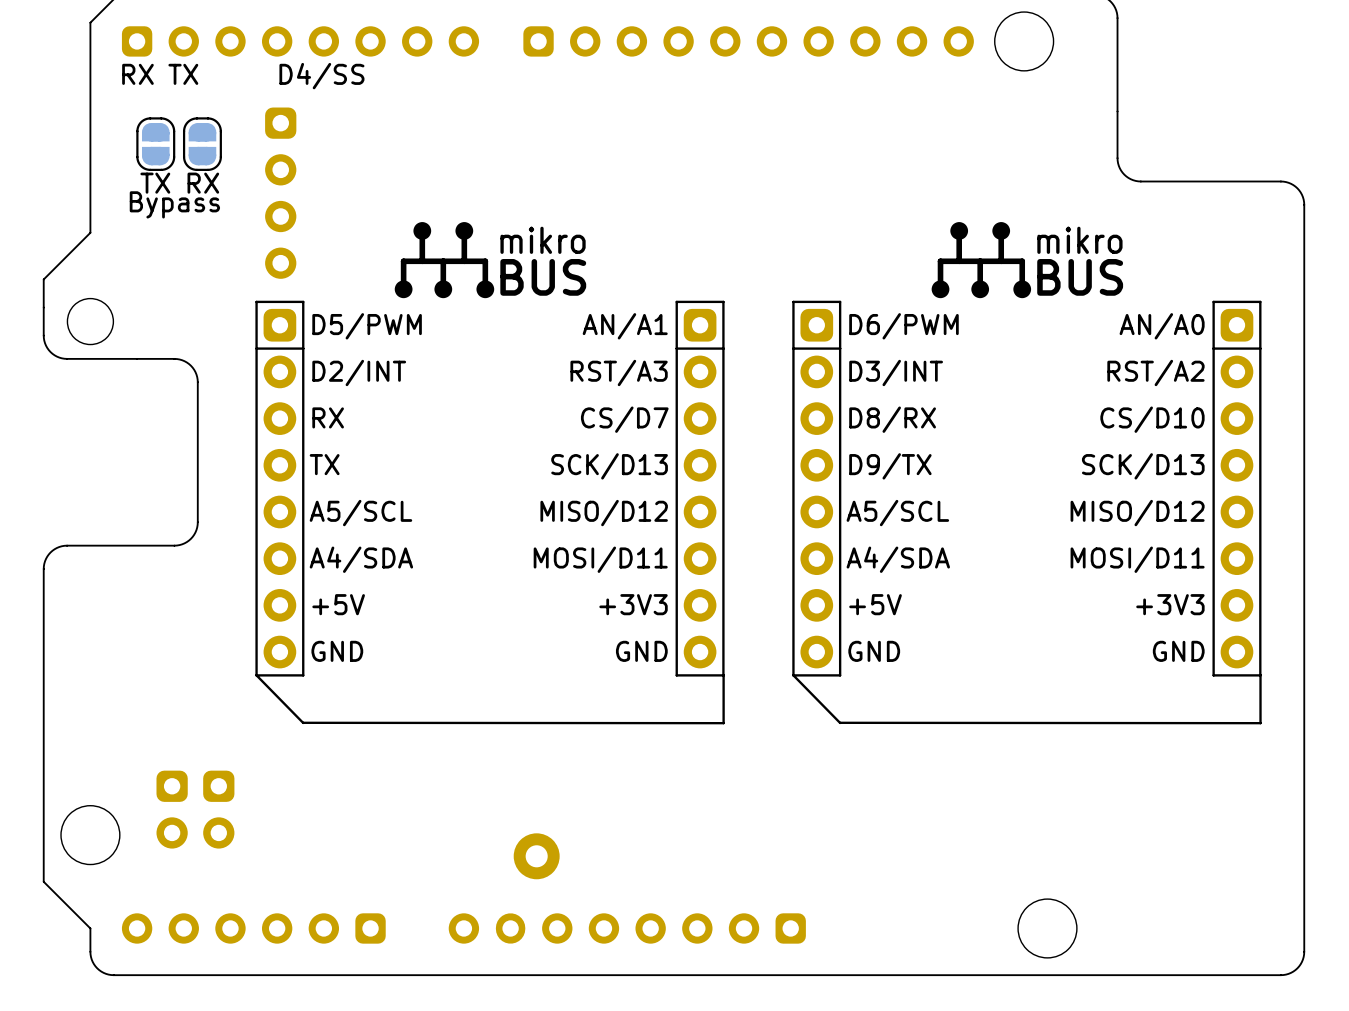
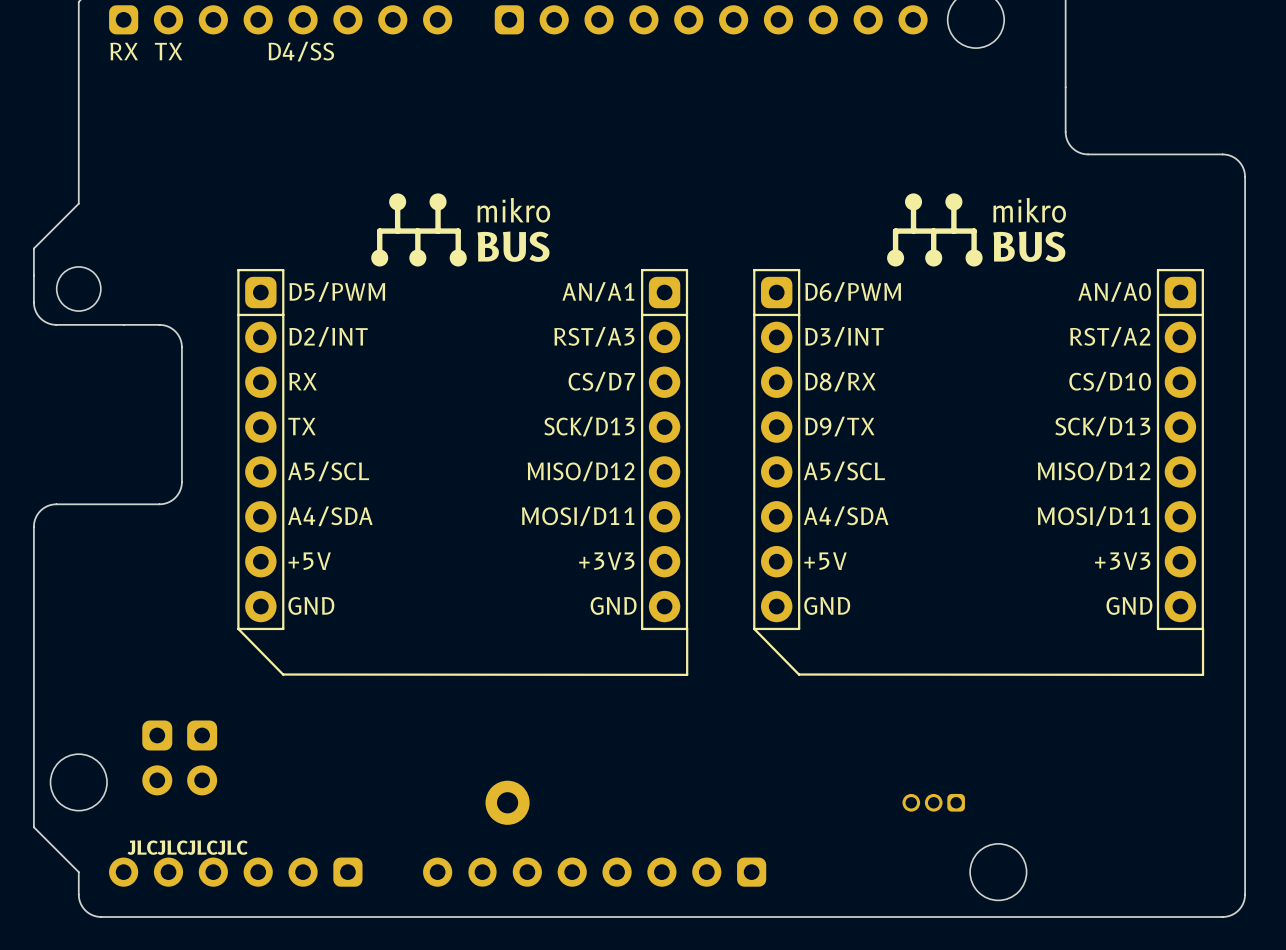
part: TX (155, 144) -> none
part: RX (202, 144) -> none
part: (280, 193) -> none
part: none -> (933, 802)
text: none -> JLCJLCJLCJLC (187, 847)

